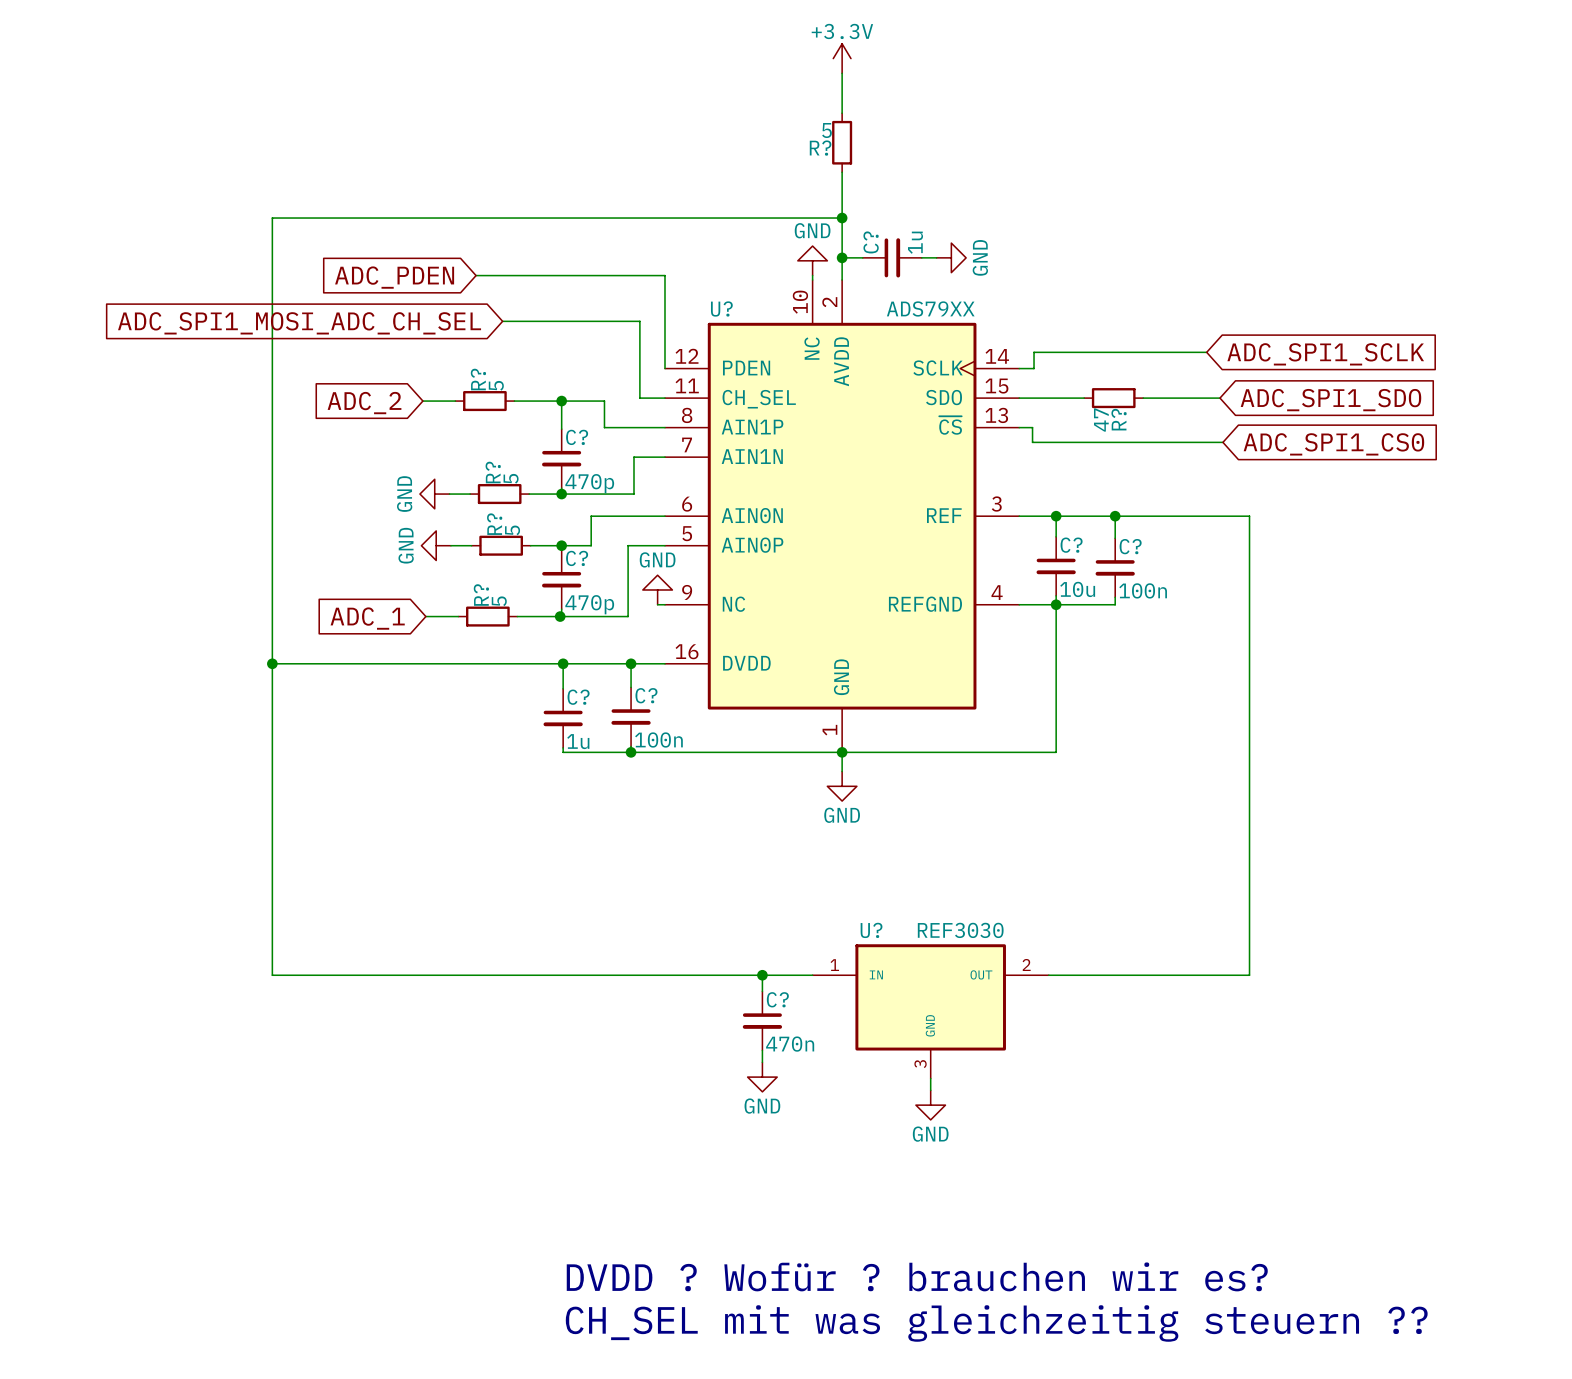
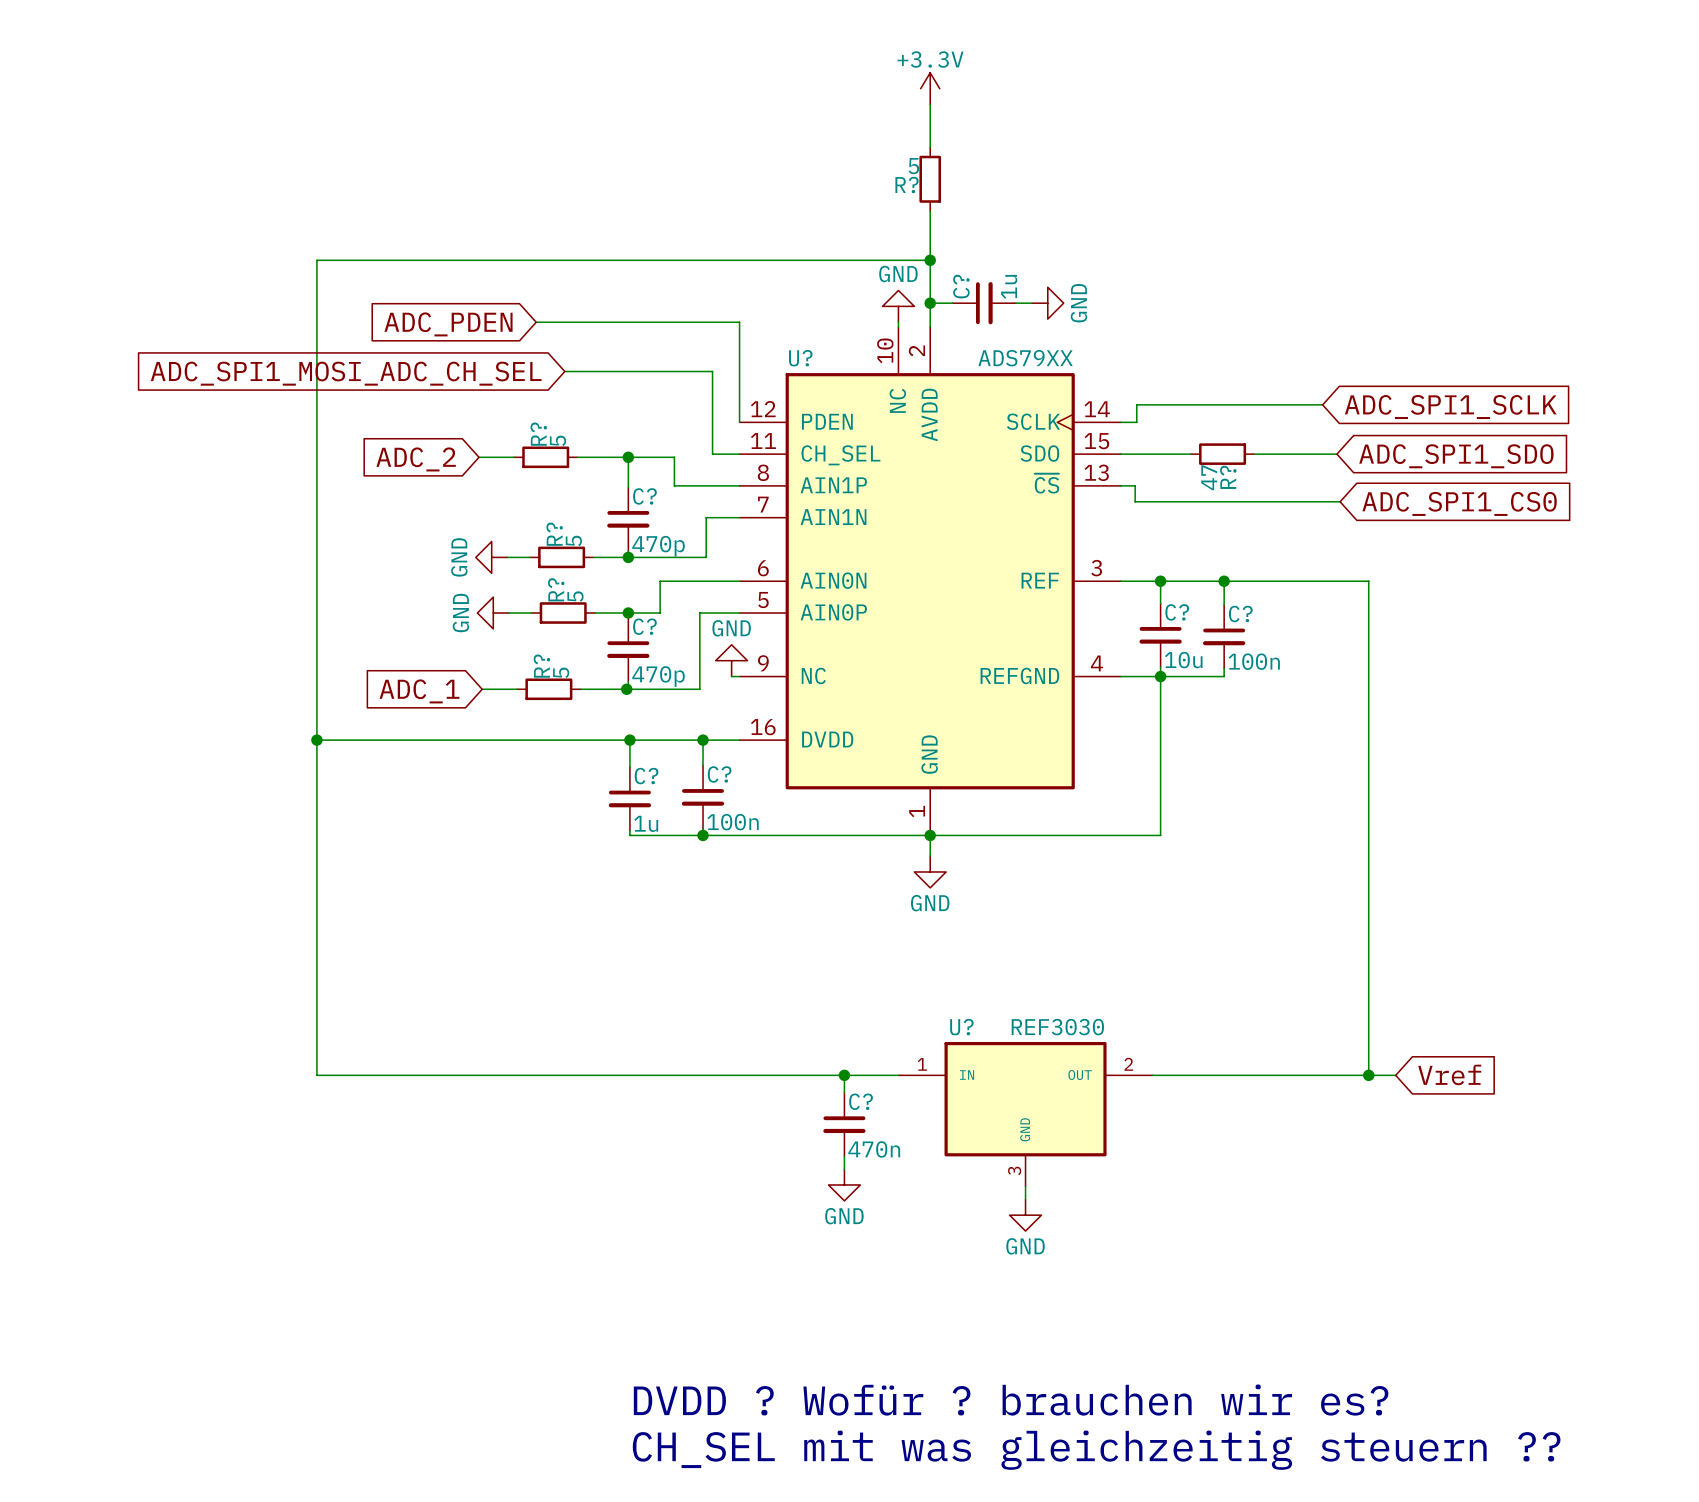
global label: none -> Vref (1449, 1074)
wire: none -> (1368, 1075) (1395, 1075)
junction: none -> (1368, 1075)

